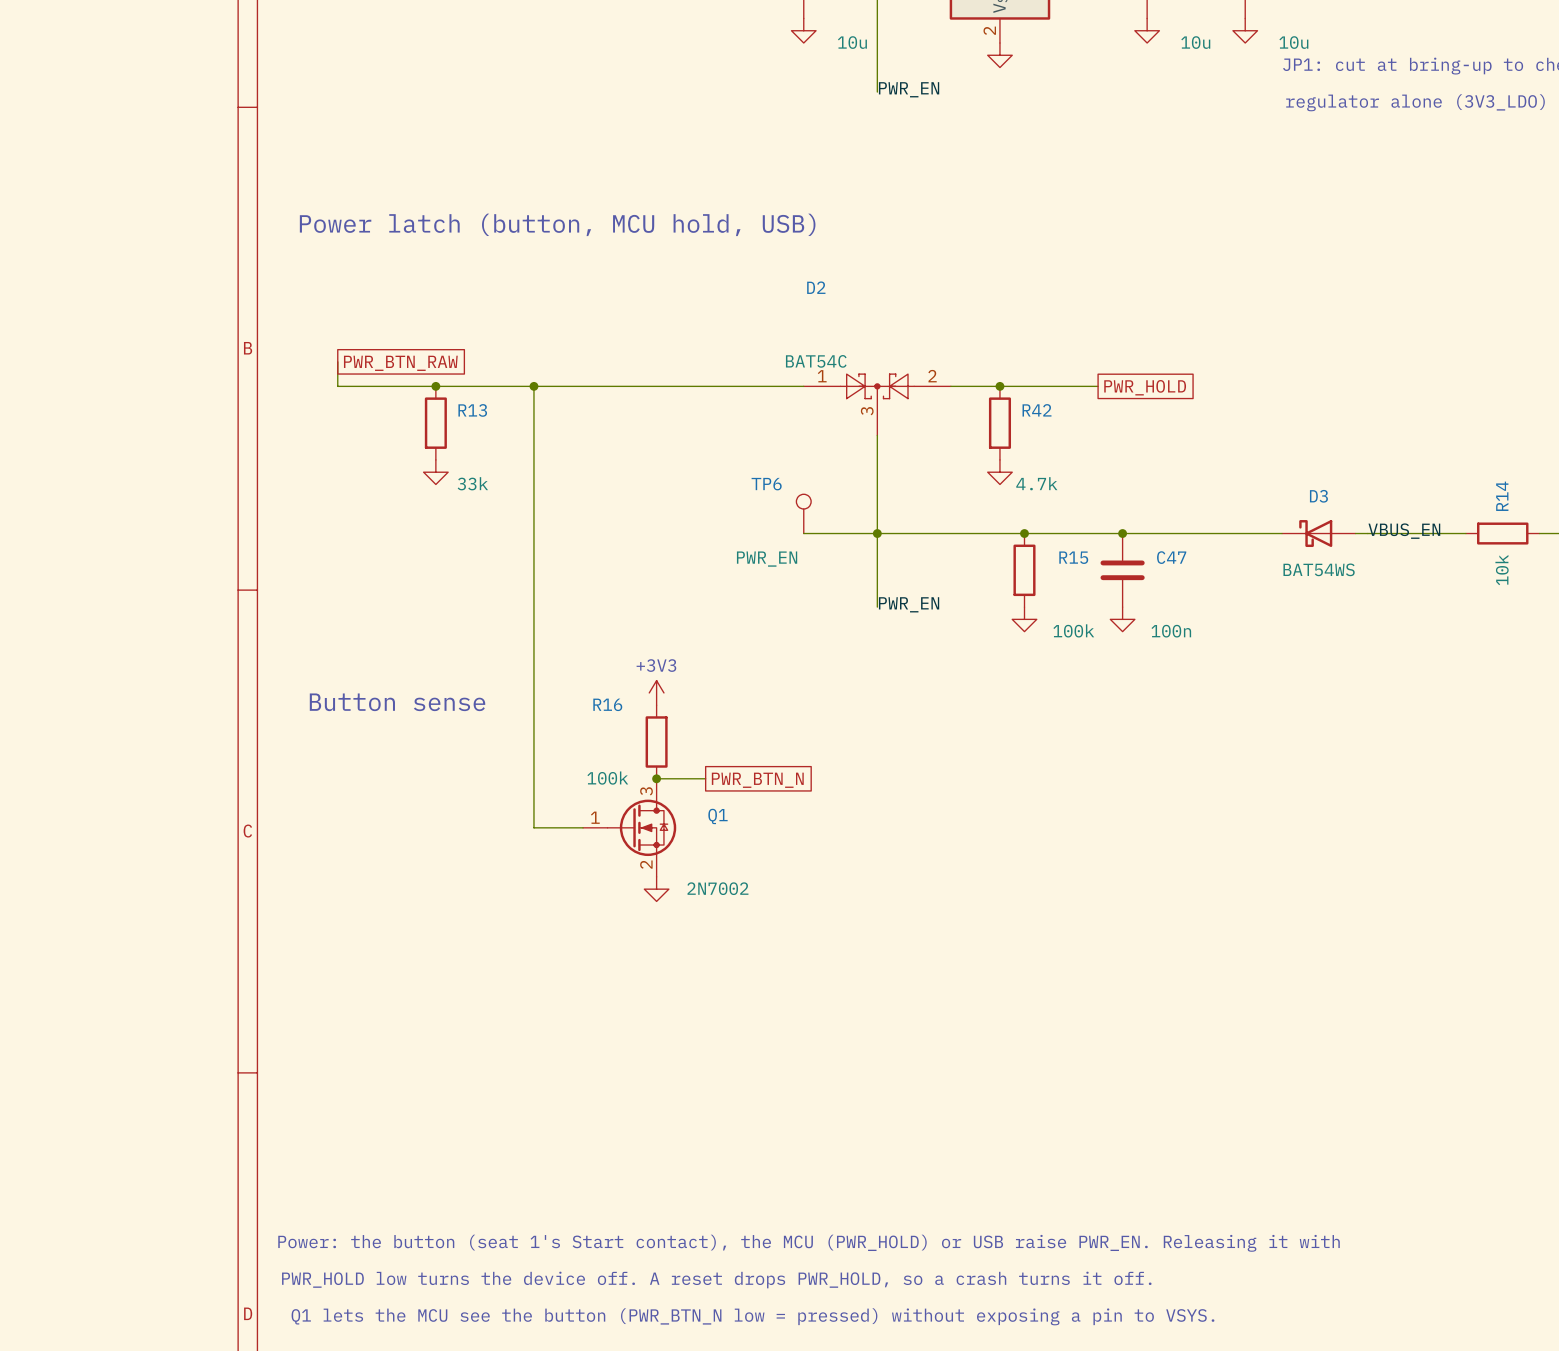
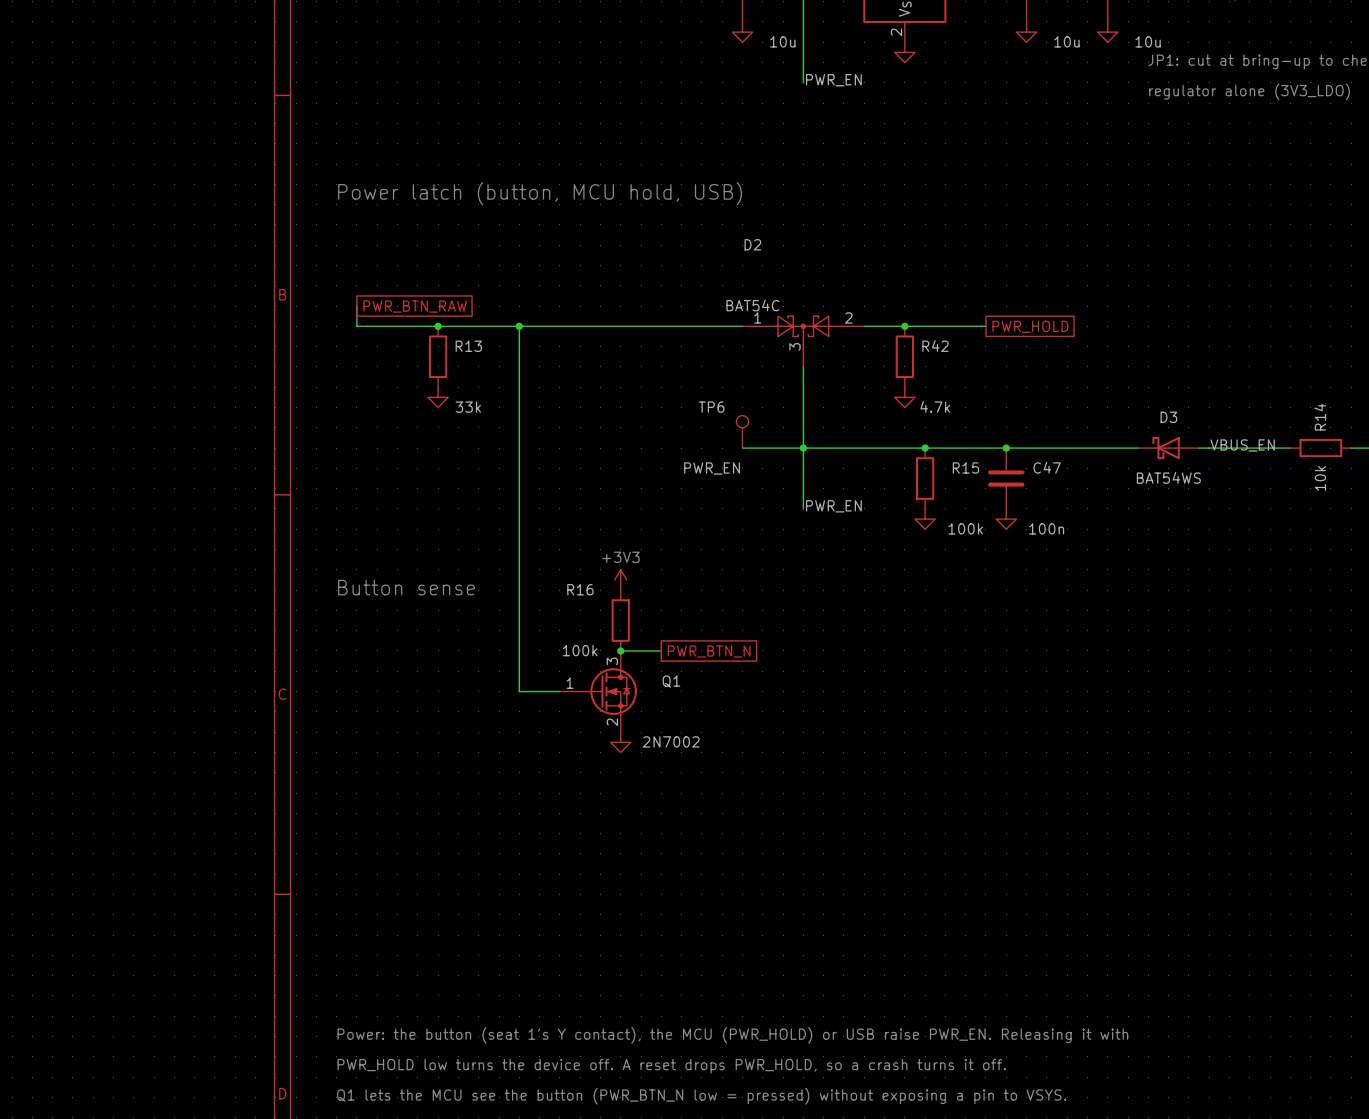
text: Power: the button (seat 1's Start contact), the MCU (PWR_HOLD) or USB raise PWR_EN. Releasing it with (809, 1243) -> Power: the button (seat 1's Y contact), the MCU (PWR_HOLD) or USB raise PWR_EN. Releasing it with (732, 1035)

